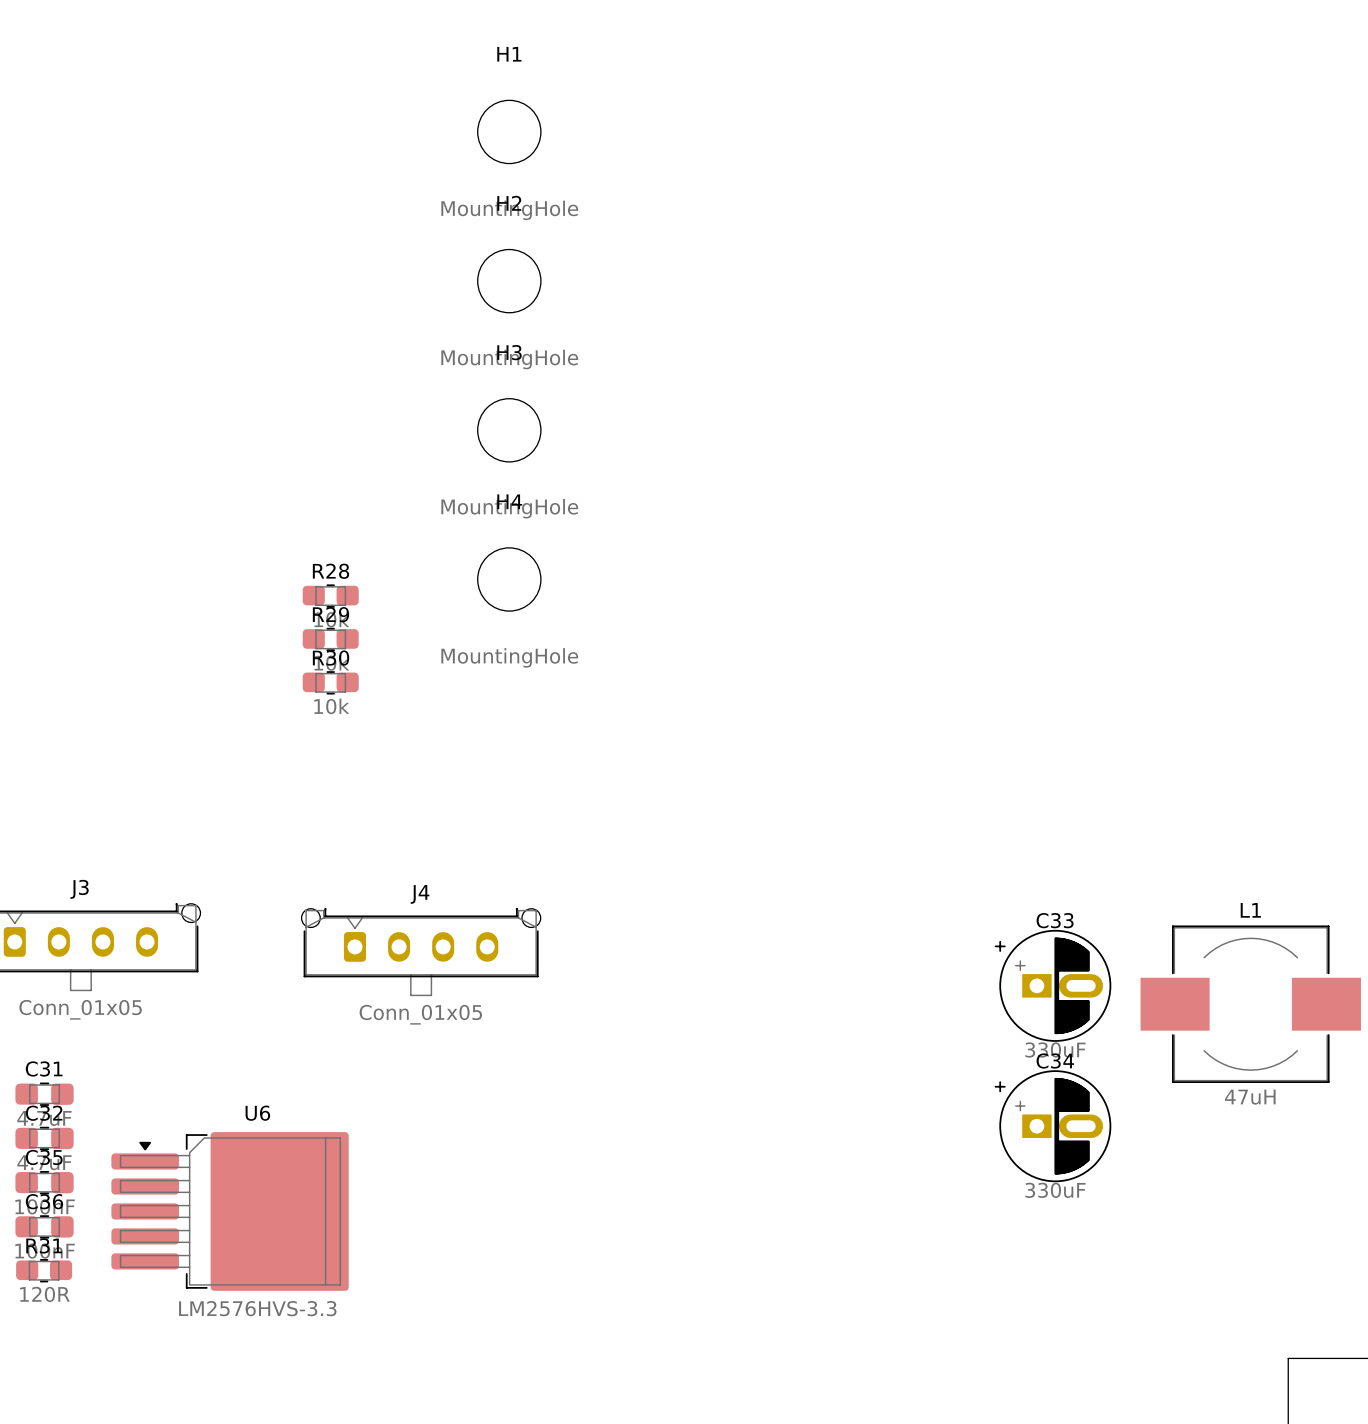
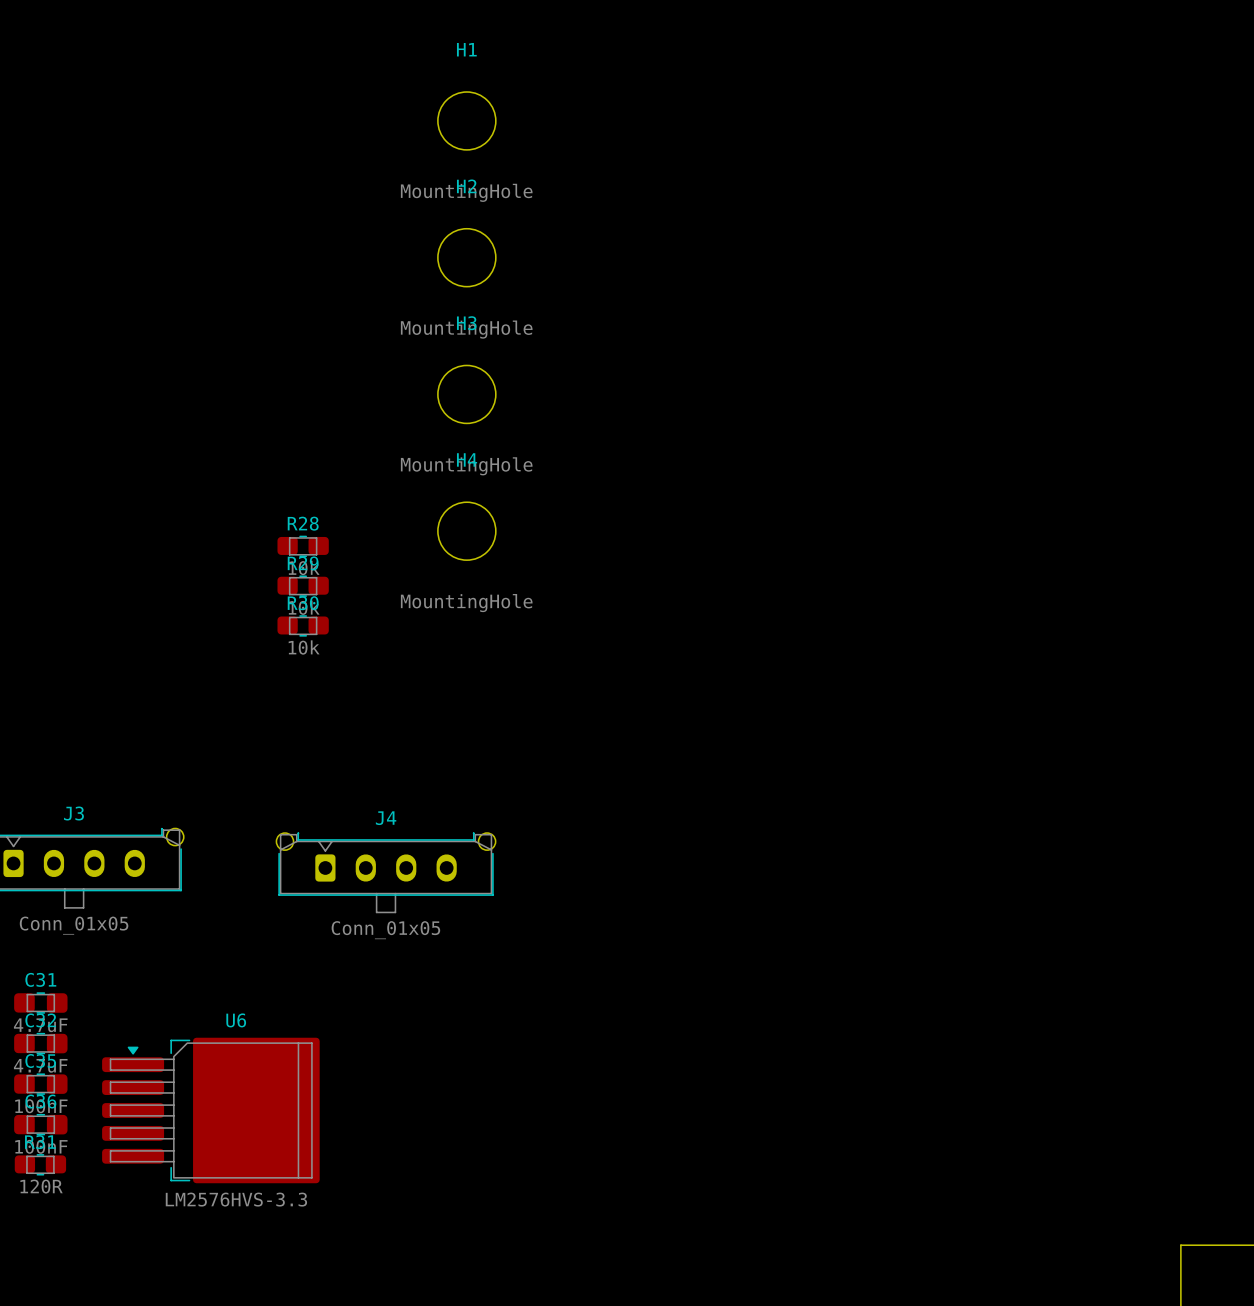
C33: 330uF (1052, 985) -> none
L1: 47uH (1250, 1004) -> none
C34: 330uF (1052, 1126) -> none

